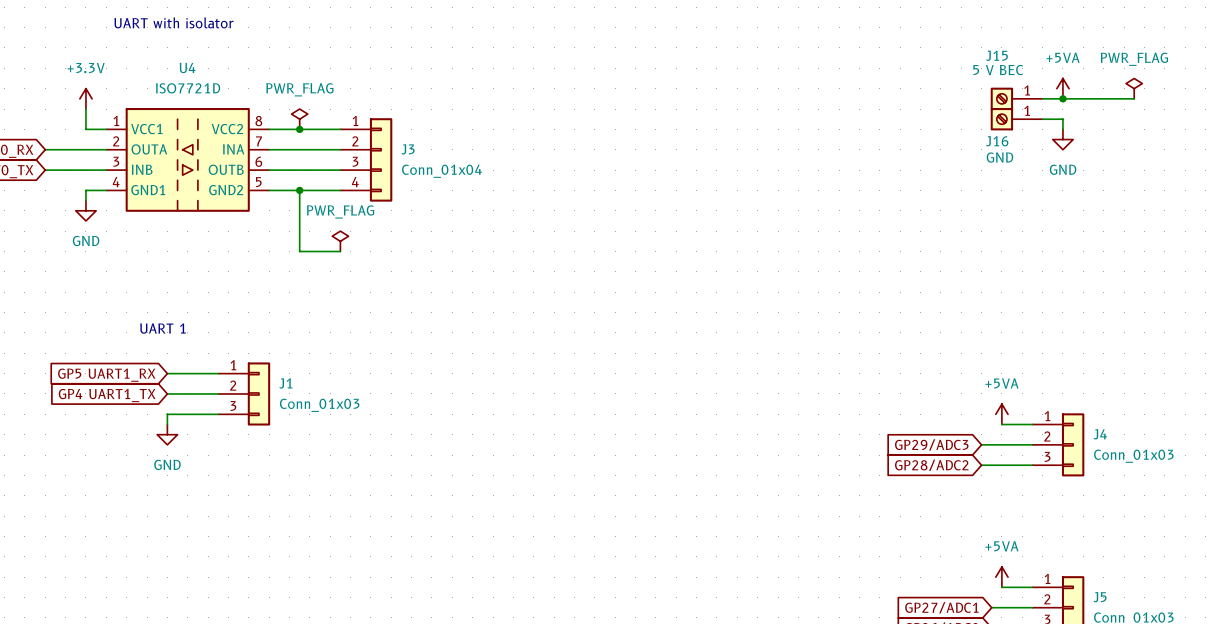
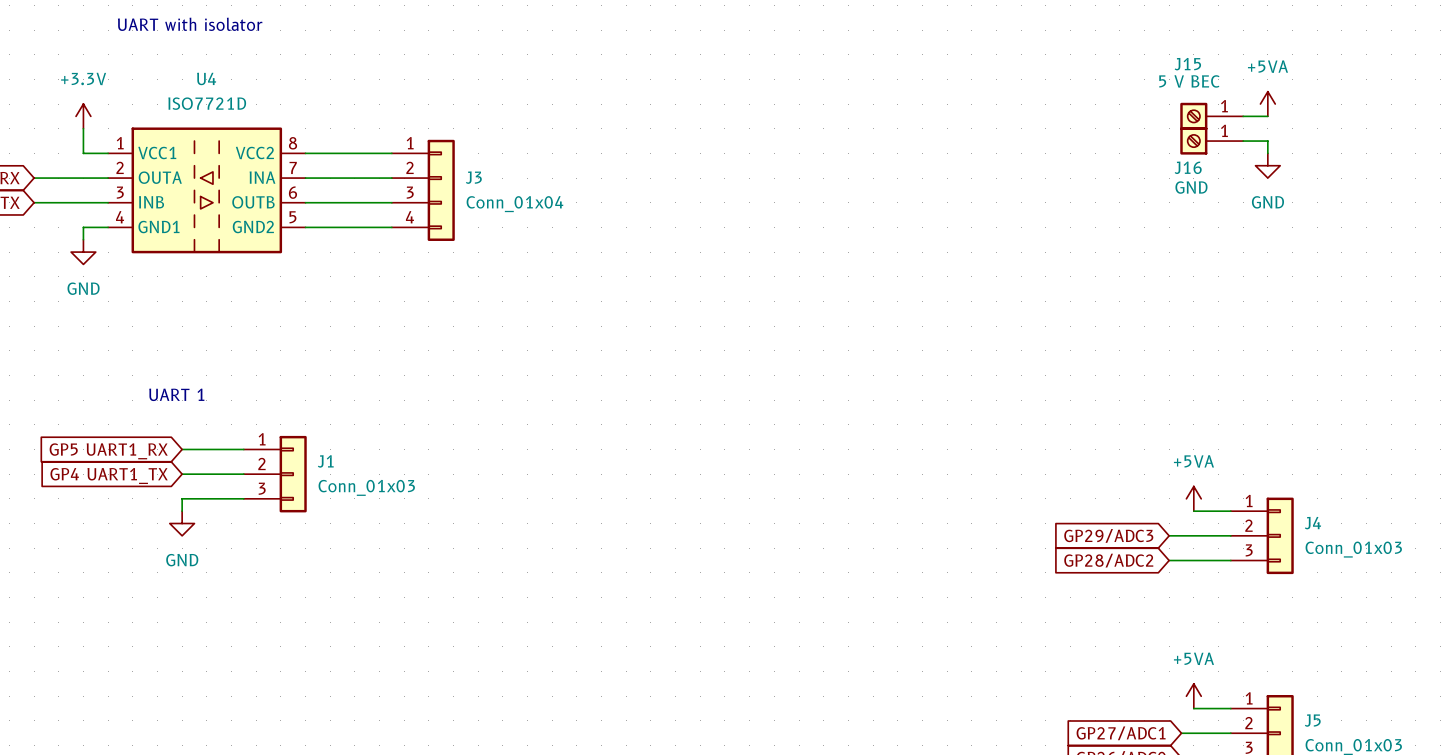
power symbol: PWR_FLAG (1134, 88) -> none
wire: (1062, 98) (1134, 98) -> none
junction: (1062, 98) -> none
power symbol: PWR_FLAG (299, 119) -> none
junction: (299, 129) -> none
wire: (299, 190) (299, 251) (340, 251) -> none
junction: (299, 190) -> none
power symbol: PWR_FLAG (340, 241) -> none

